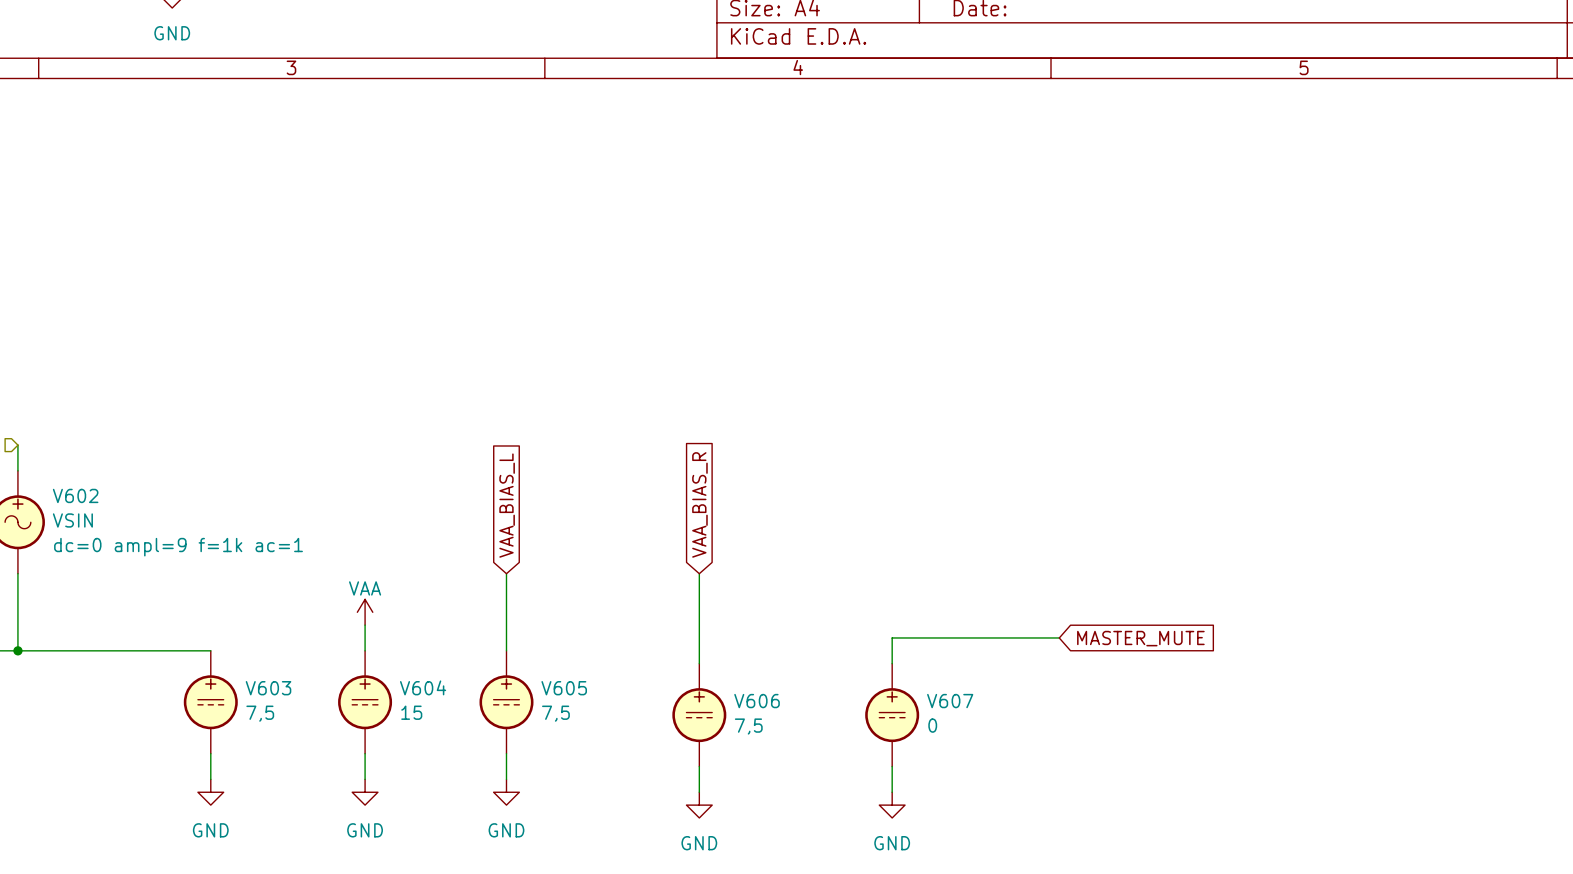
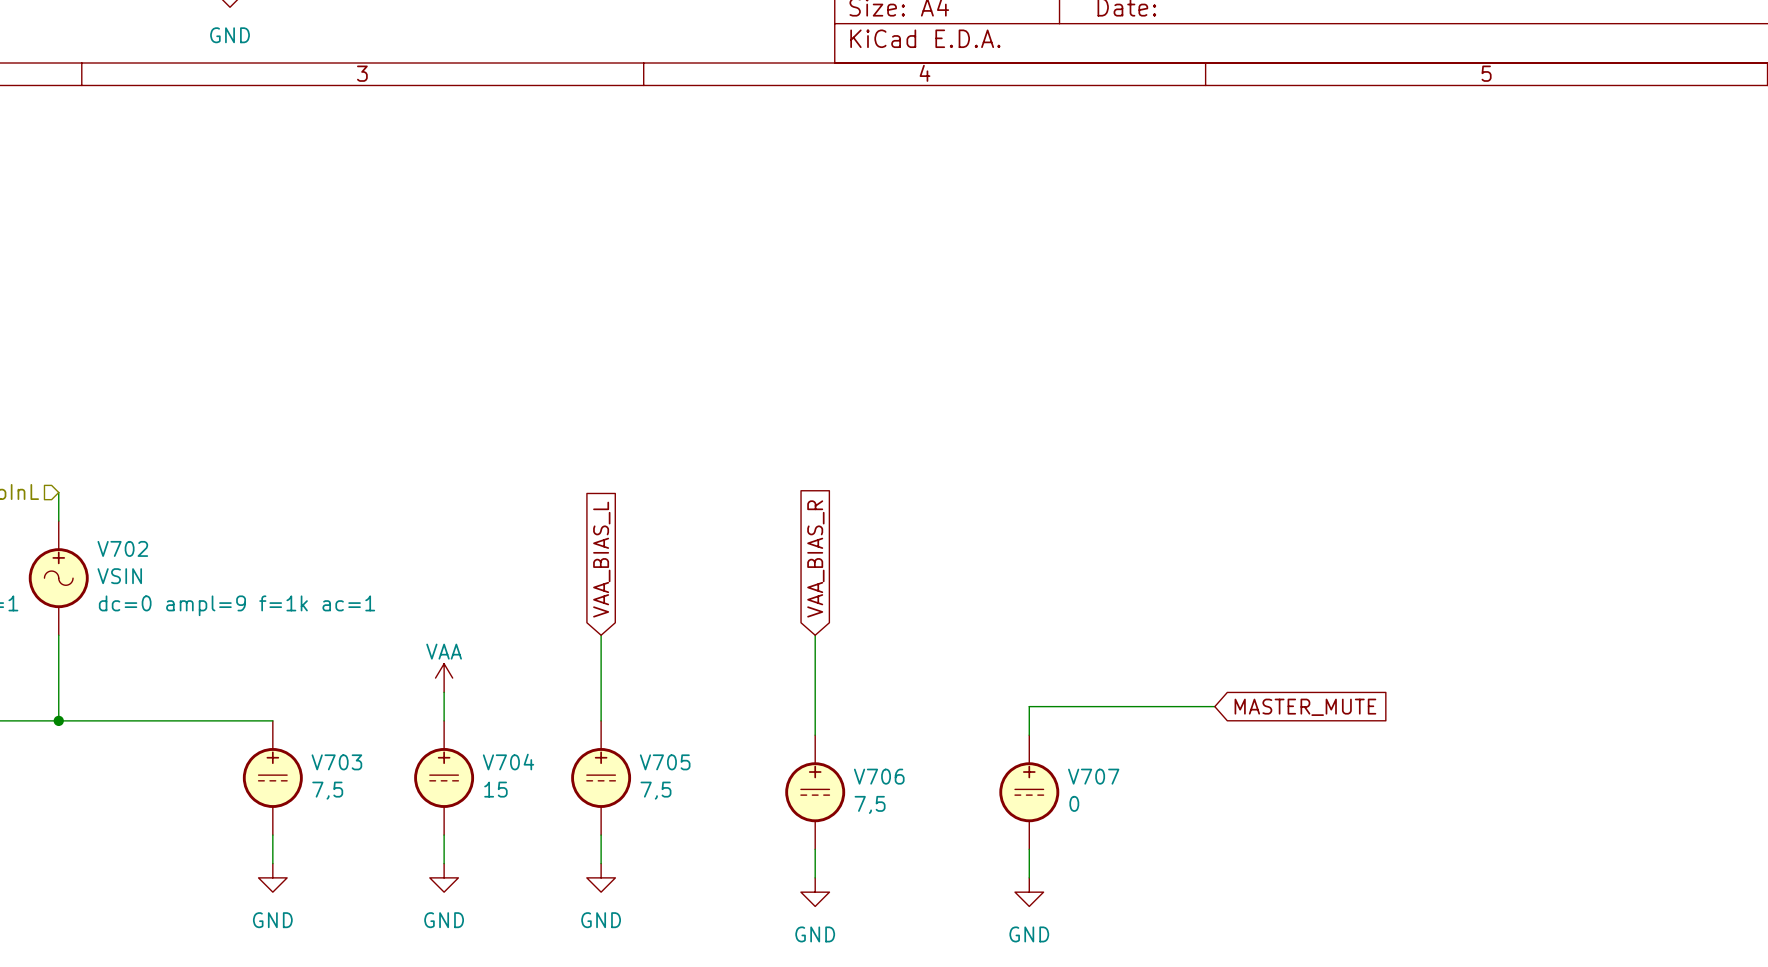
V602 name: V602 (75, 495) -> V702 (122, 548)
V604 name: V604 (423, 687) -> V704 (508, 762)
V603 name: V603 (268, 688) -> V703 (336, 762)
V605 name: V605 (564, 688) -> V705 (665, 762)
V606 name: V606 (757, 701) -> V706 (879, 776)
V607 name: V607 (950, 701) -> V707 (1093, 776)

